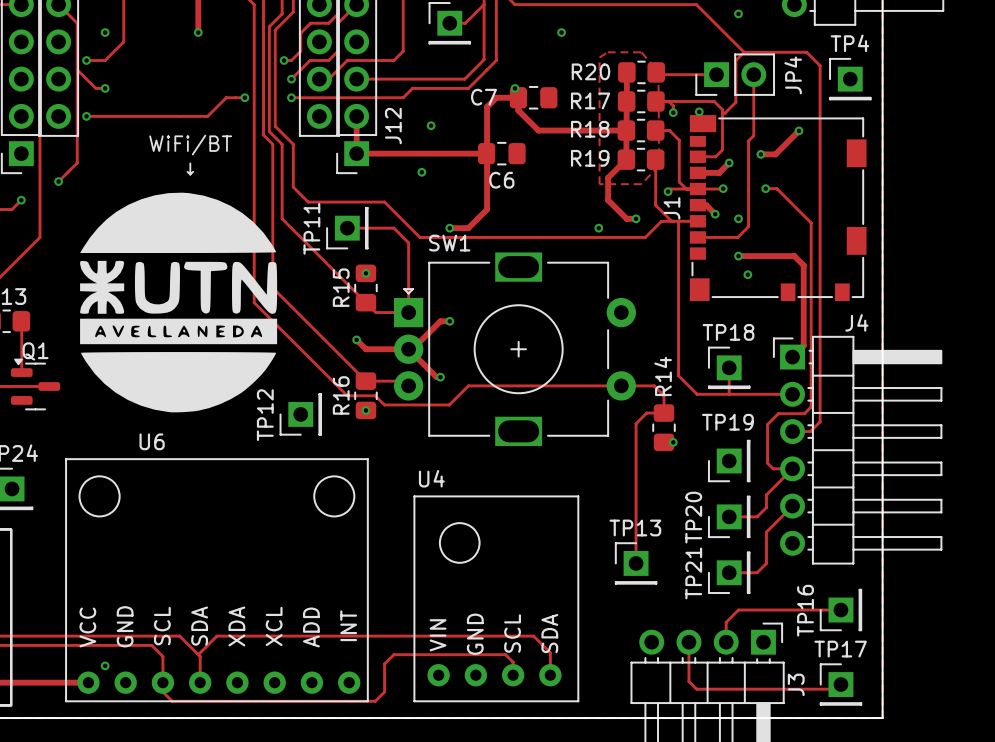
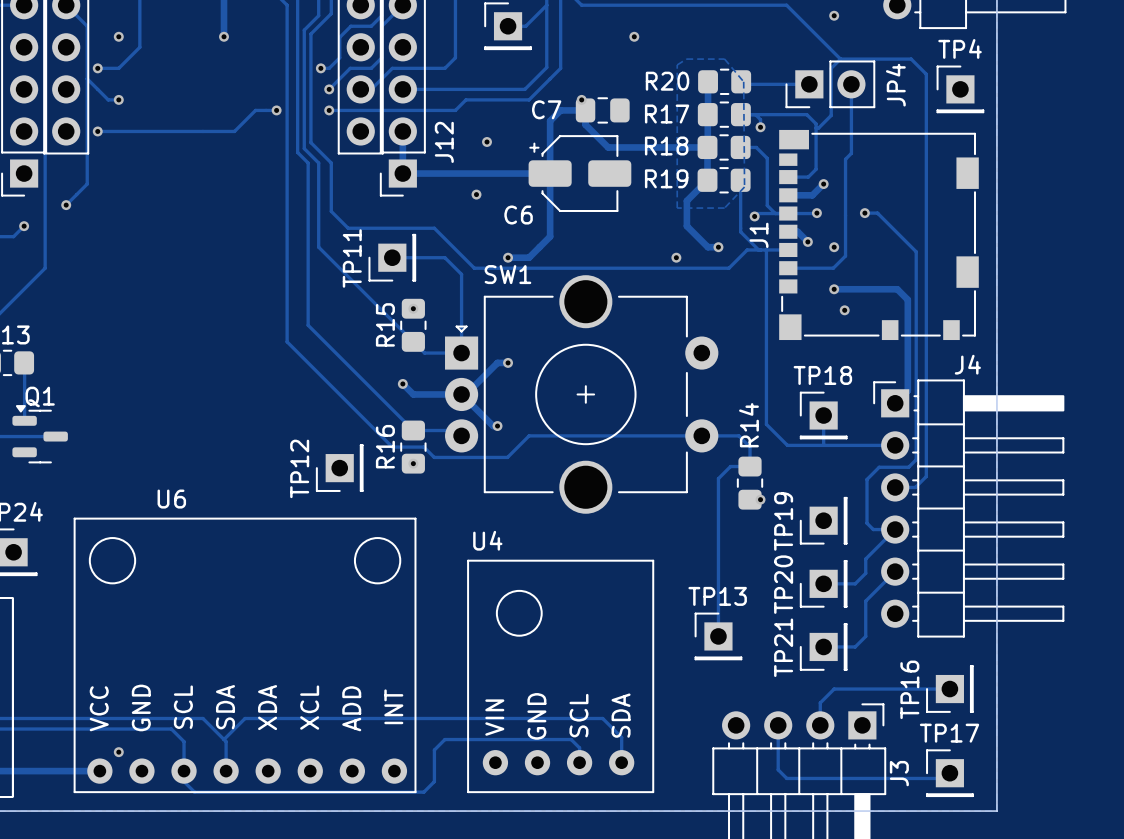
via: (699, 111) -> none
track: (799, 130) (775, 154) (760, 154) -> none
via: (799, 130) -> none
C6 footprint: [477, 141, 526, 166] -> [528, 135, 632, 212]
text: WiFi/BT (190, 145) -> none
via: (760, 154) -> none
text: ↓ (190, 168) -> none
C6 name position: C6 (501, 180) -> C6 (518, 215)
drawing: [80, 192, 278, 413] -> none
SW1 footprint: [393, 252, 636, 447] -> [445, 275, 719, 514]
TP19 name rotation: 0° (727, 422) -> 90° counterclockwise (783, 521)

